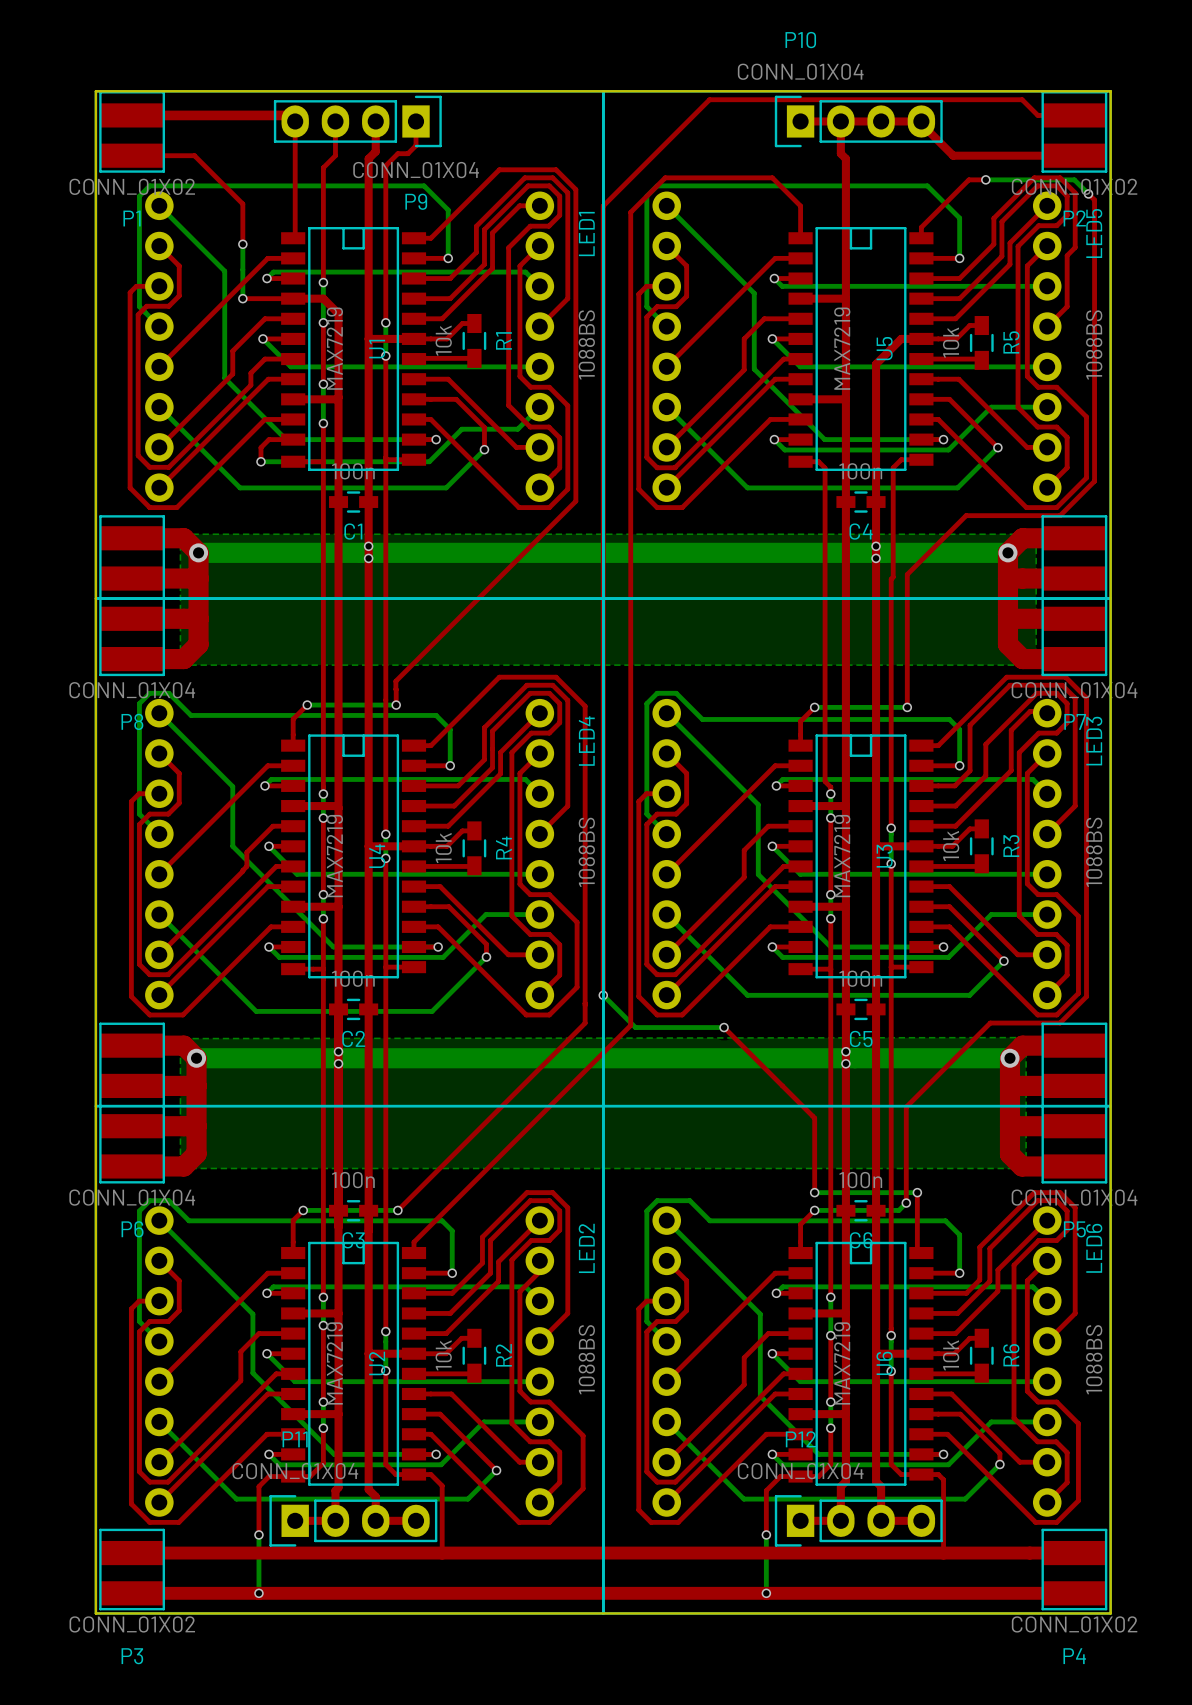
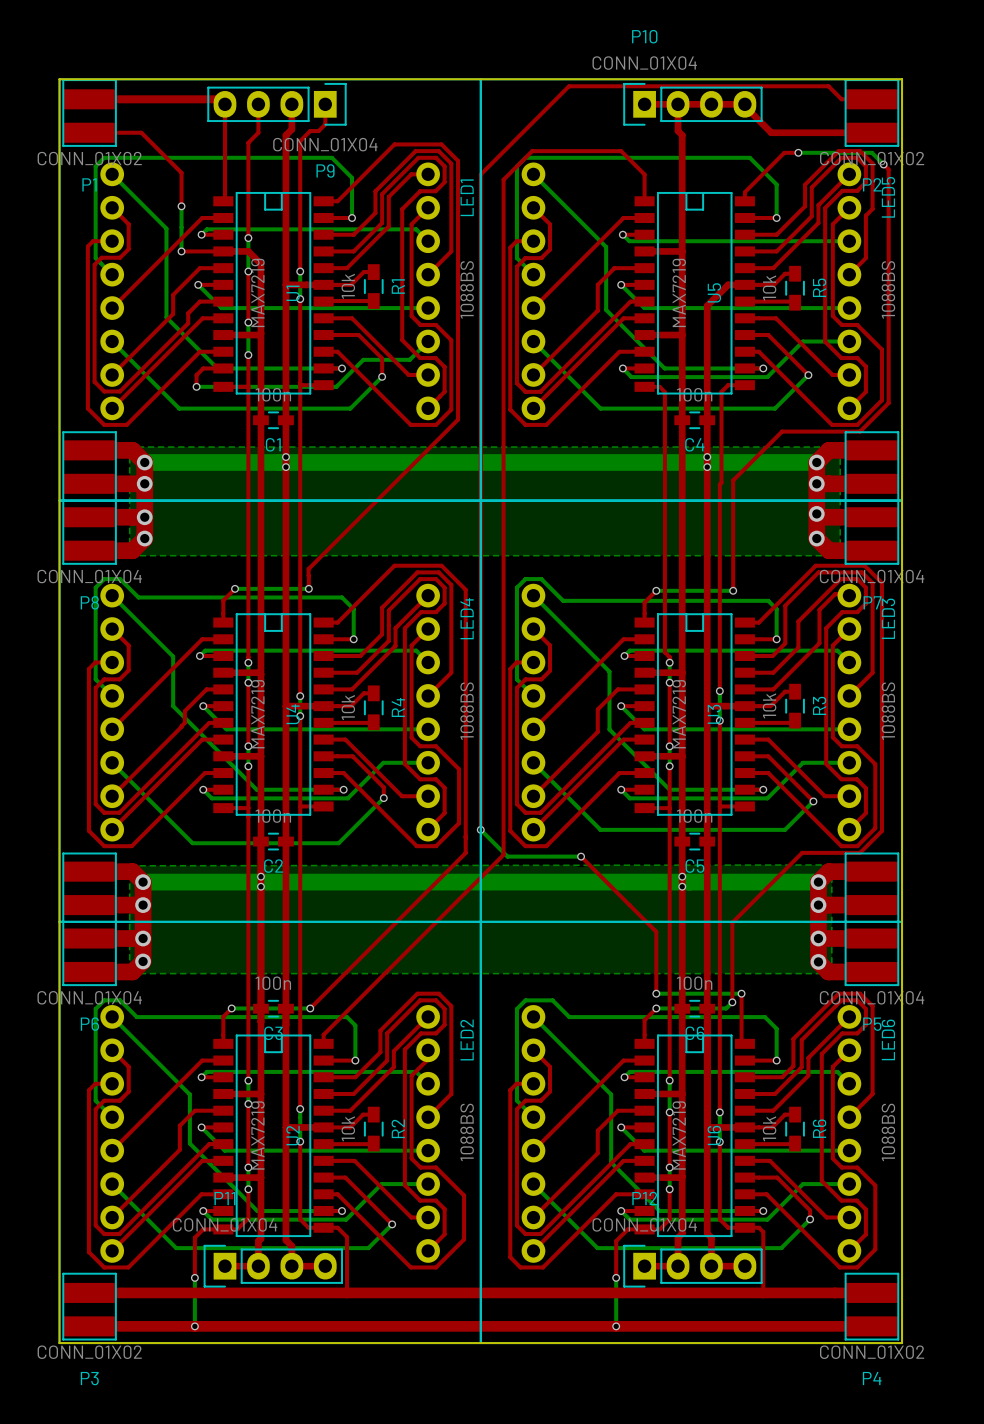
via: none -> (144, 483)
via: none -> (816, 483)
via: none -> (816, 513)
via: none -> (144, 517)
via: none -> (144, 538)
via: none -> (816, 538)
via: none -> (143, 905)
via: none -> (818, 905)
via: none -> (143, 938)
via: none -> (818, 938)
via: none -> (143, 961)
via: none -> (818, 961)

